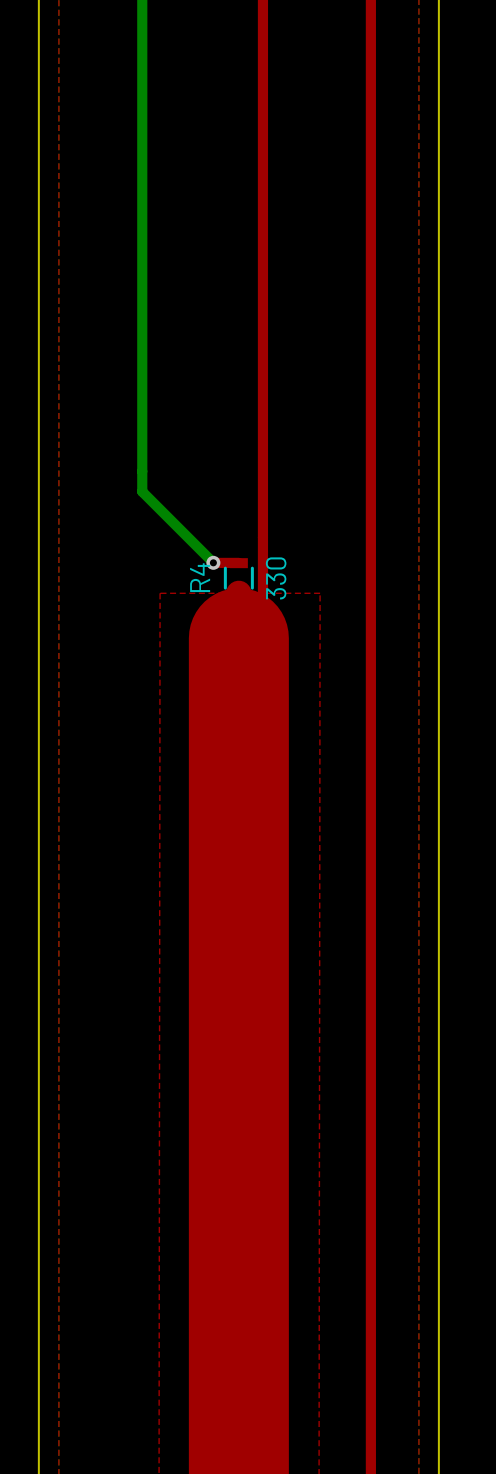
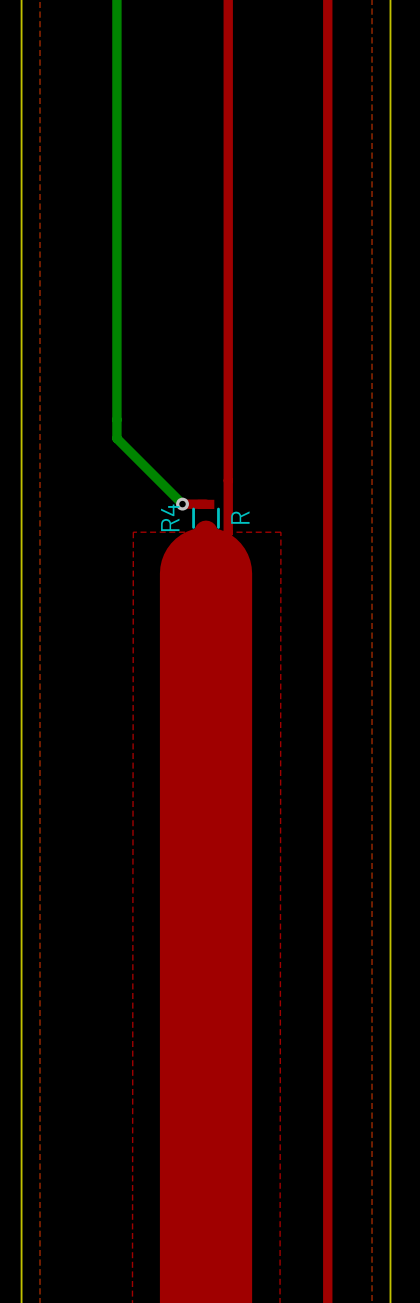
R4 value: 330 (276, 578) -> R (240, 517)

